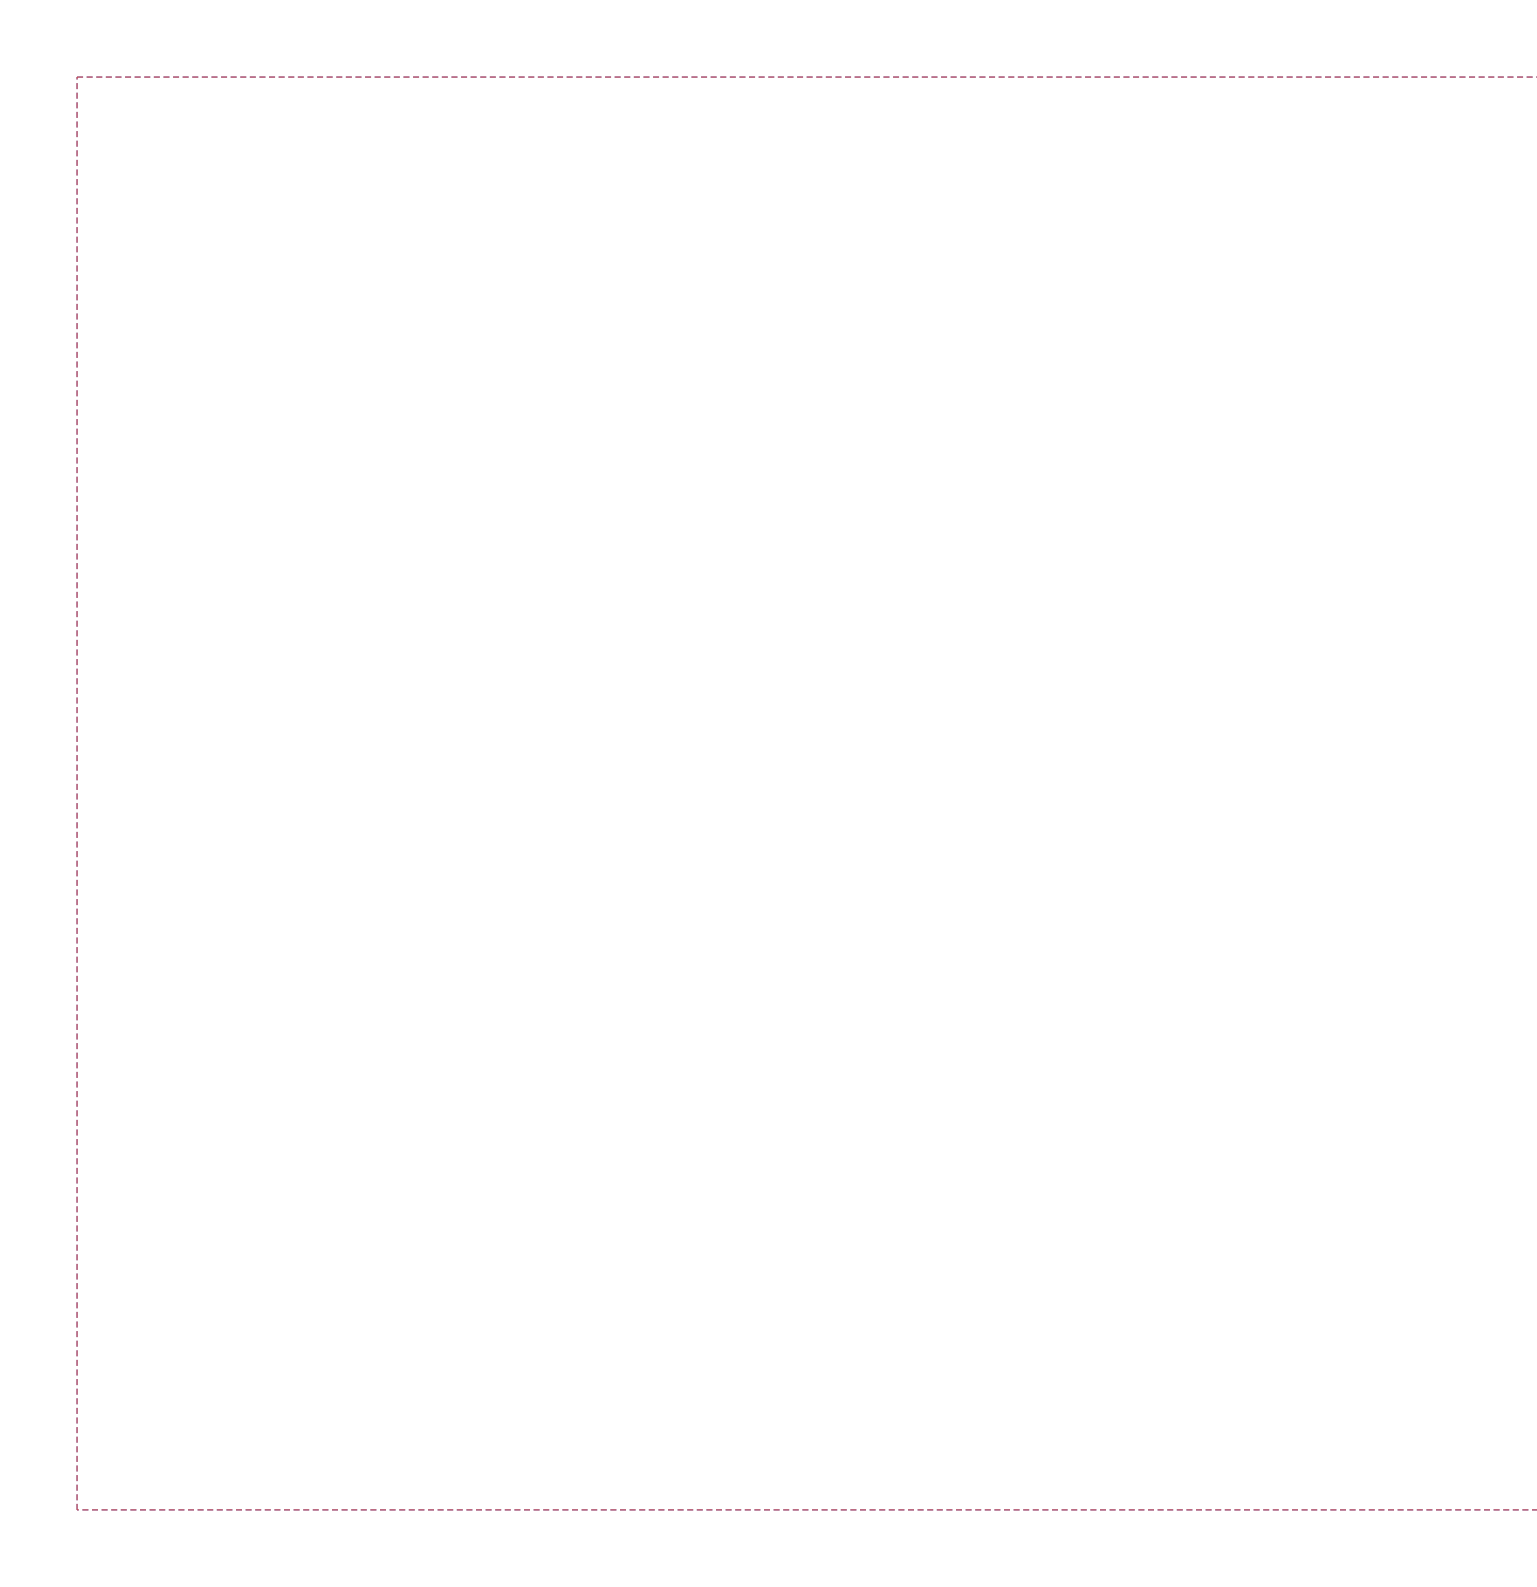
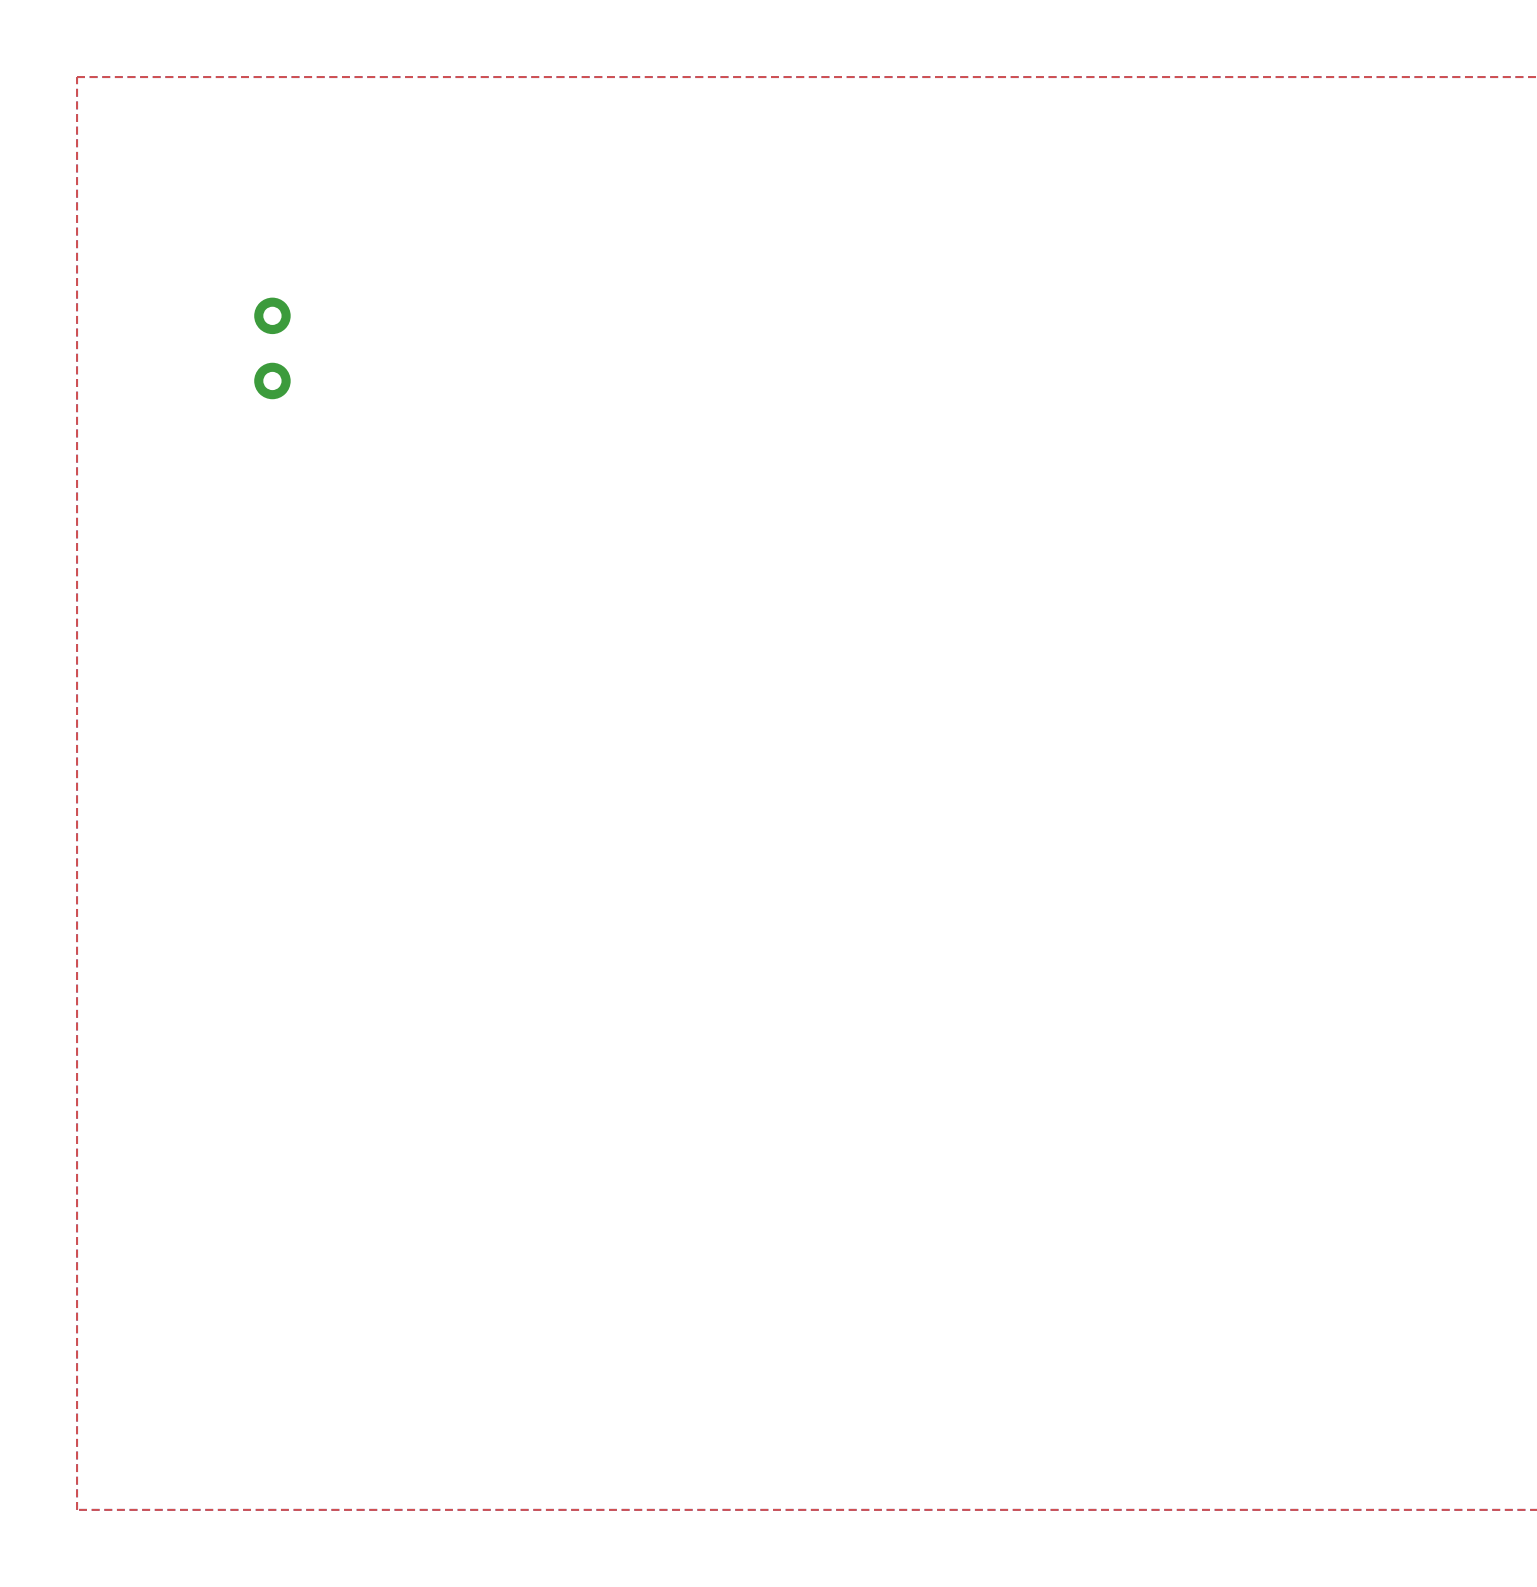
part: none -> (272, 315)
part: none -> (272, 380)

